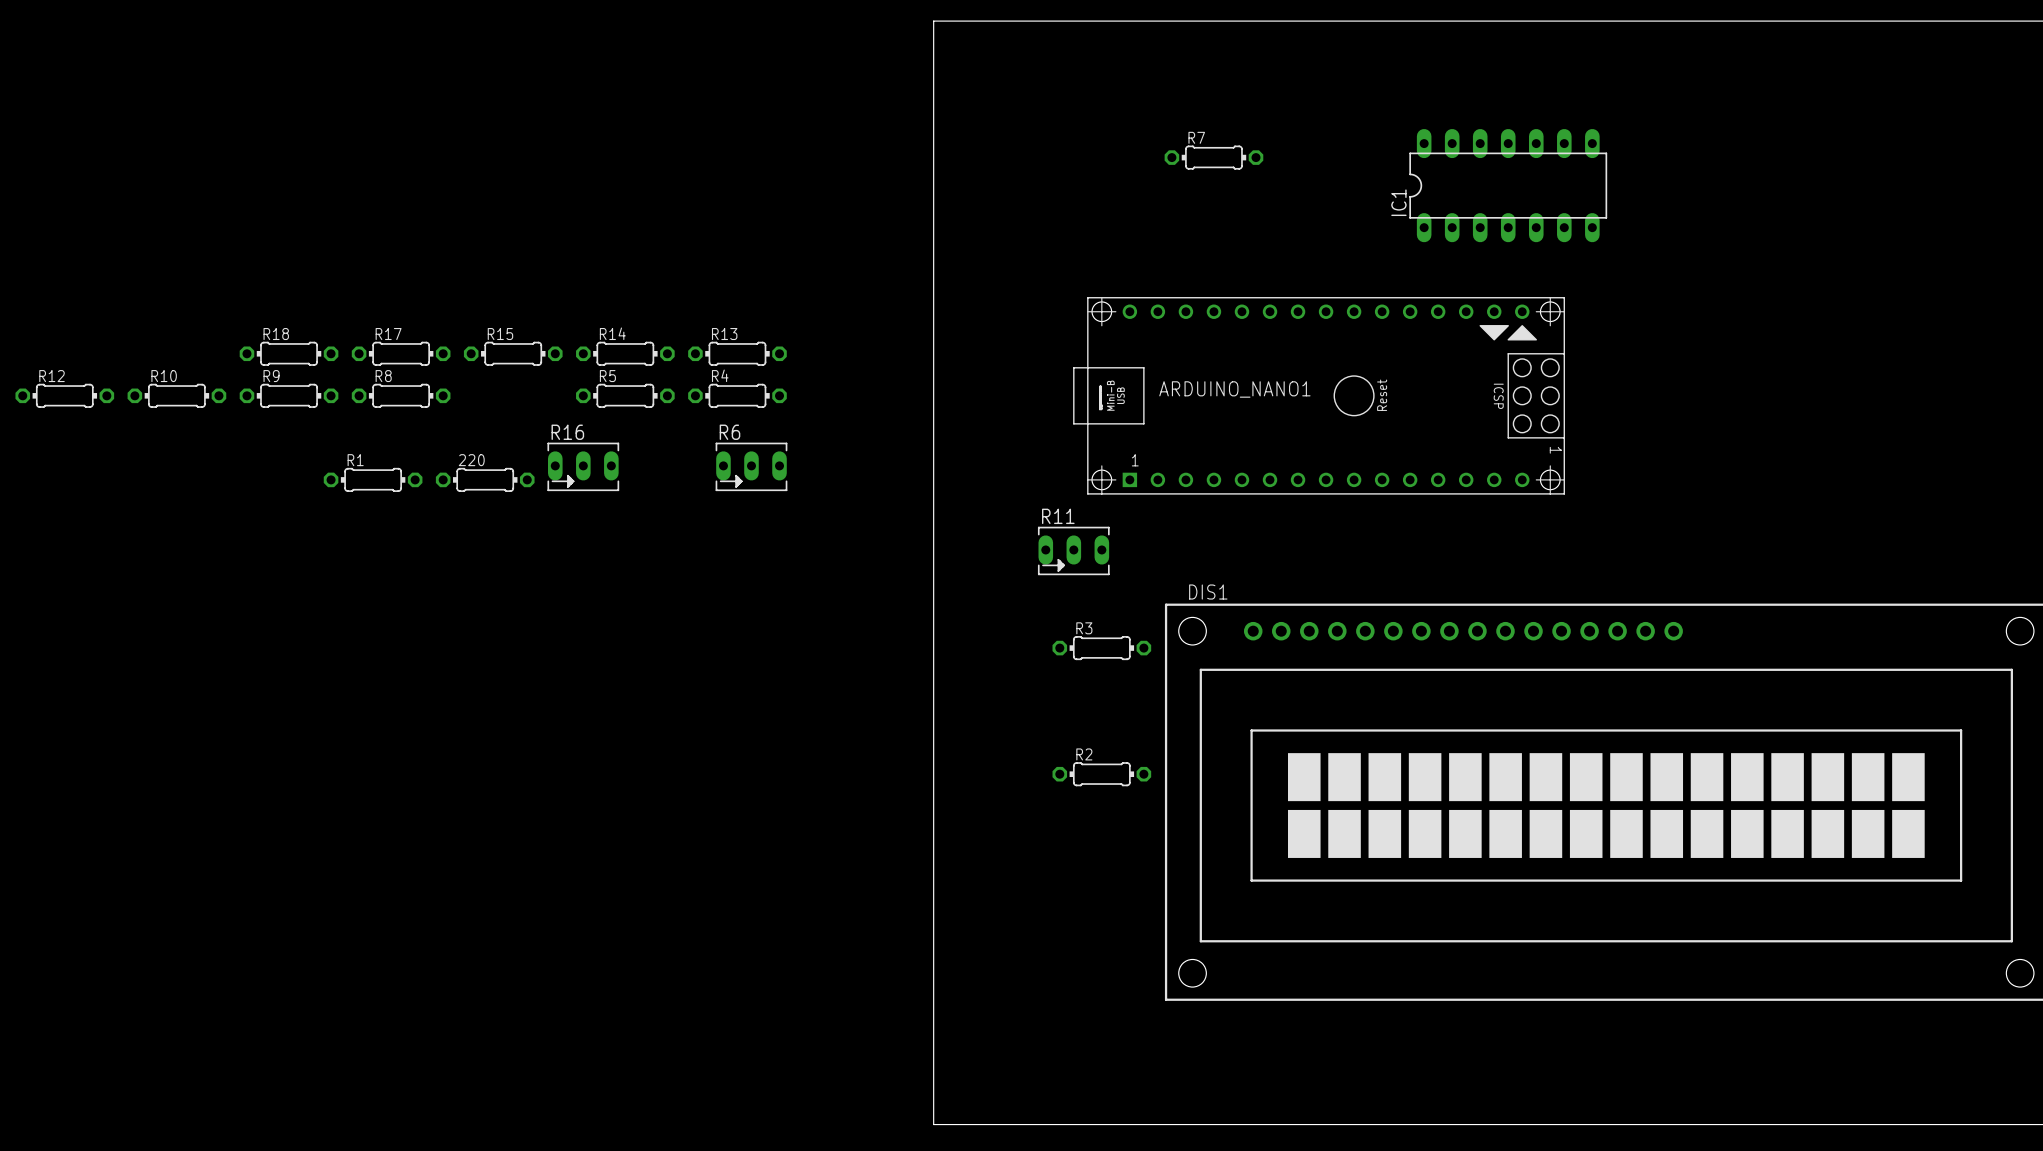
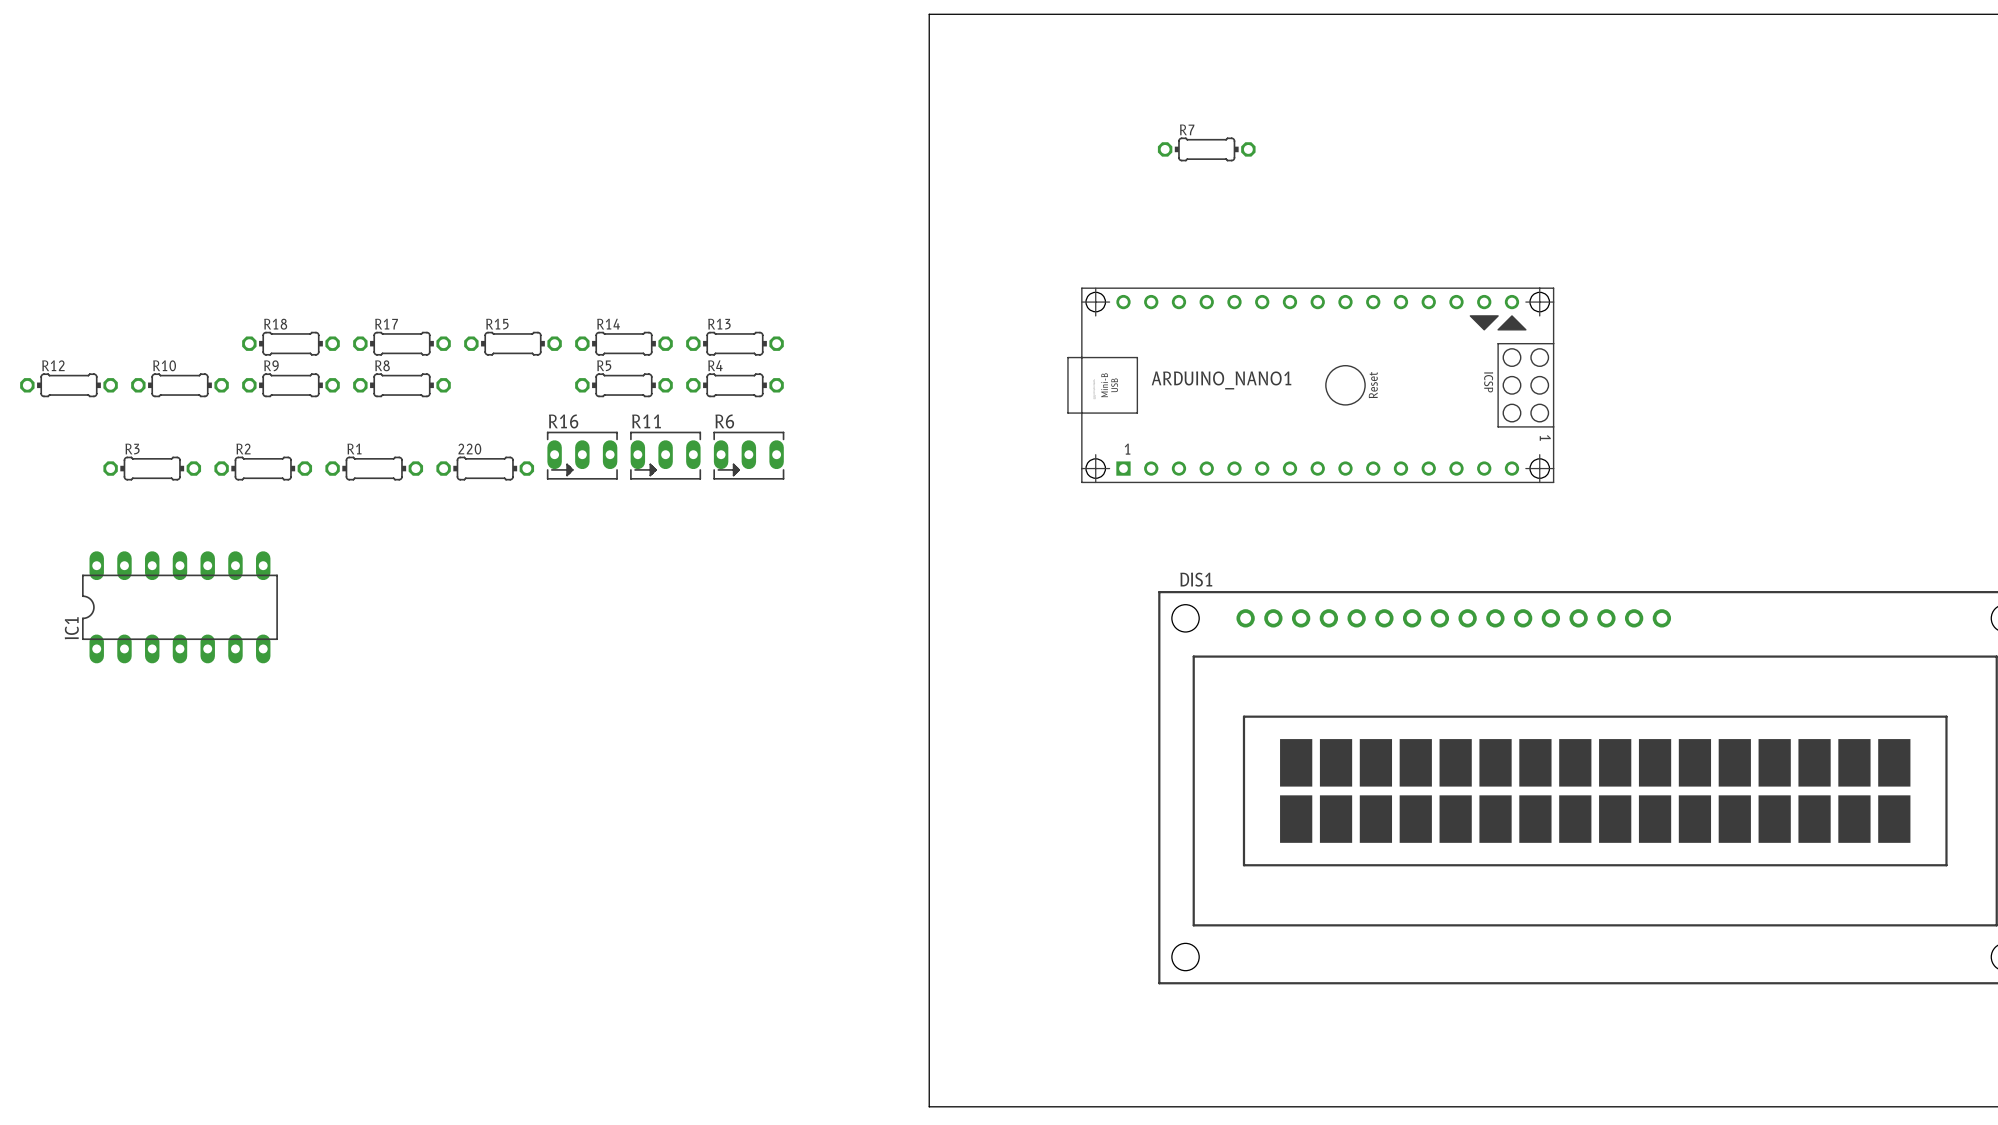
IC1 position: (1508, 185) -> (179, 607)
R11 position: (1073, 550) -> (665, 455)
R3 position: (1101, 648) -> (152, 468)
R2 position: (1101, 774) -> (263, 468)

